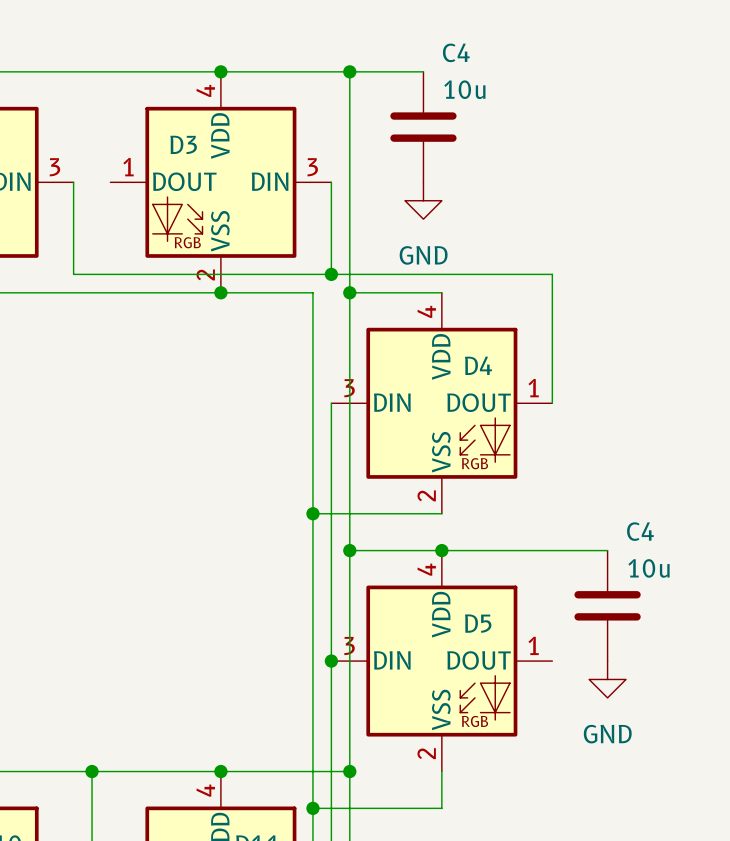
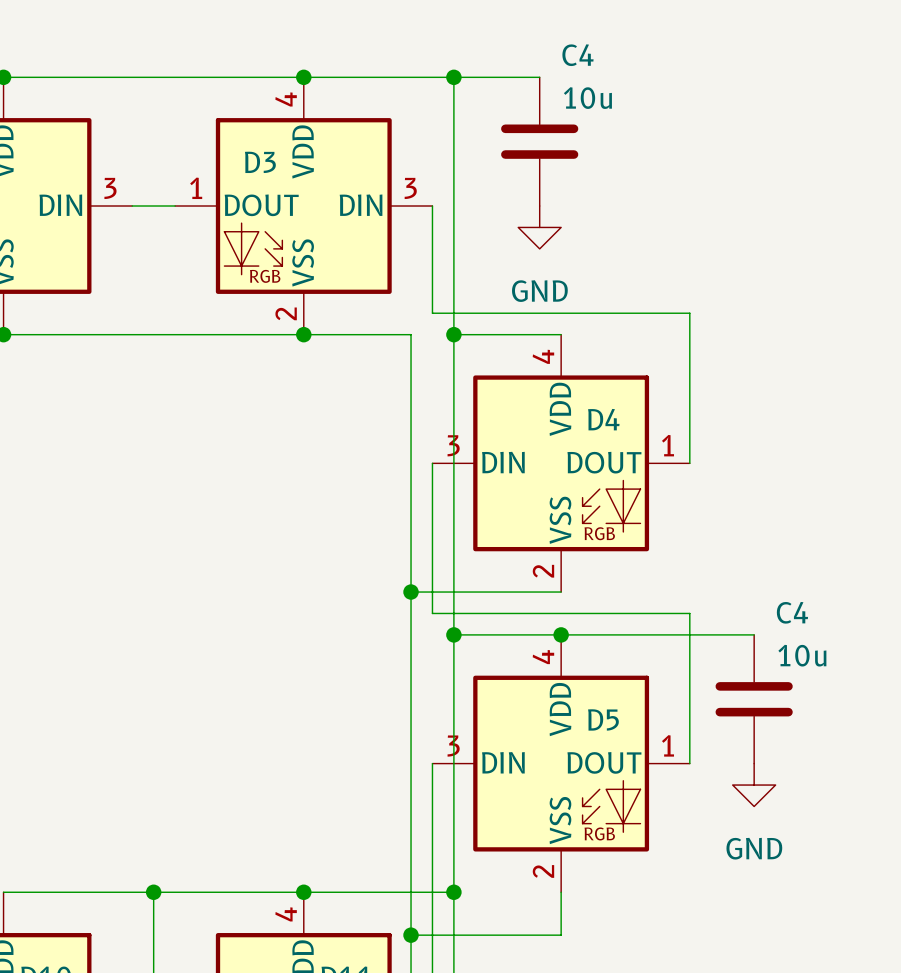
wire: (73, 182) (73, 274) (331, 274) -> (132, 206) (175, 206)
junction: (331, 274) -> none
wire: (331, 532) (331, 661) -> (432, 613) (689, 613) (689, 763)
junction: (331, 661) -> none

